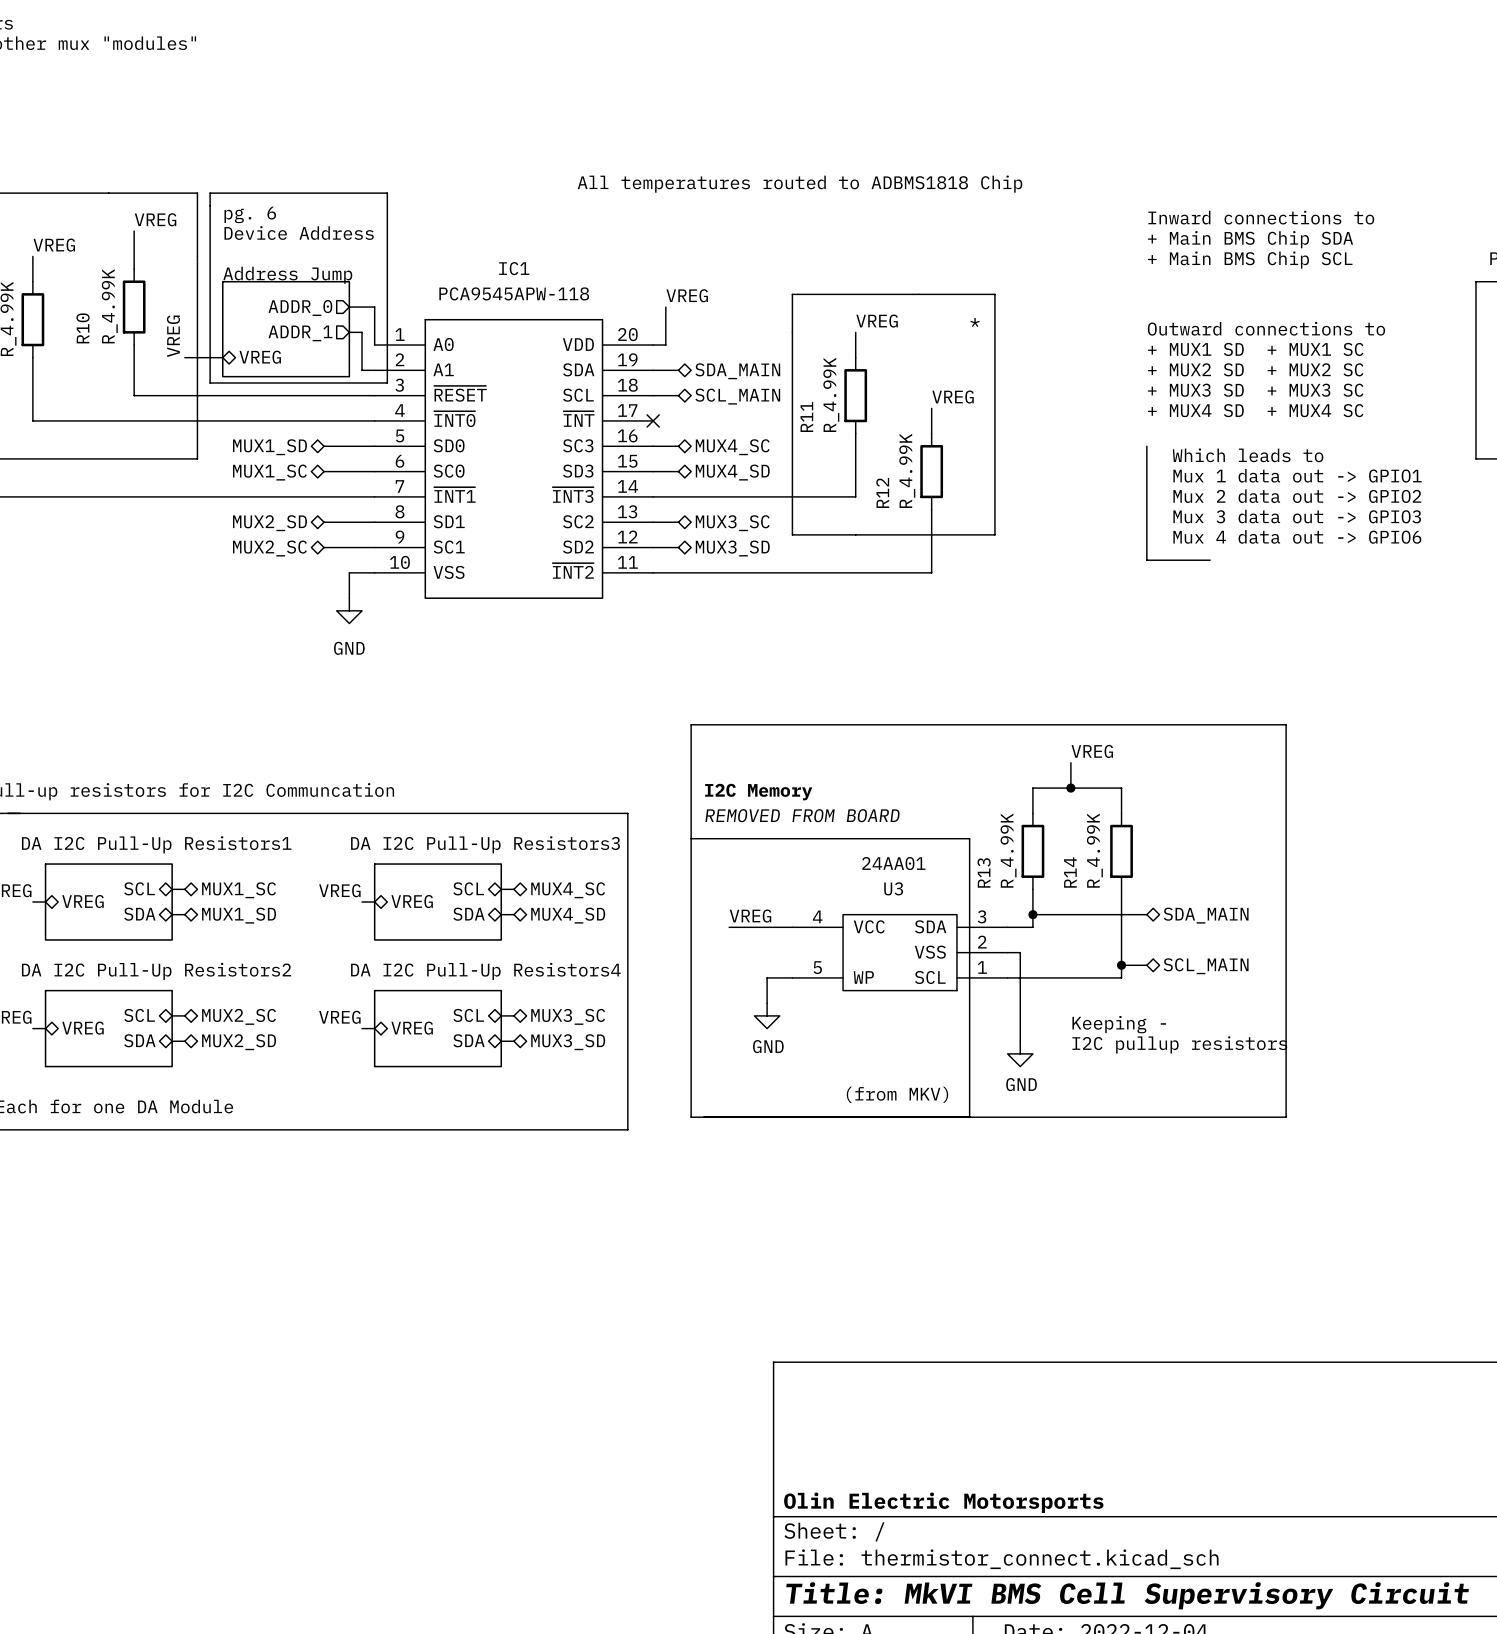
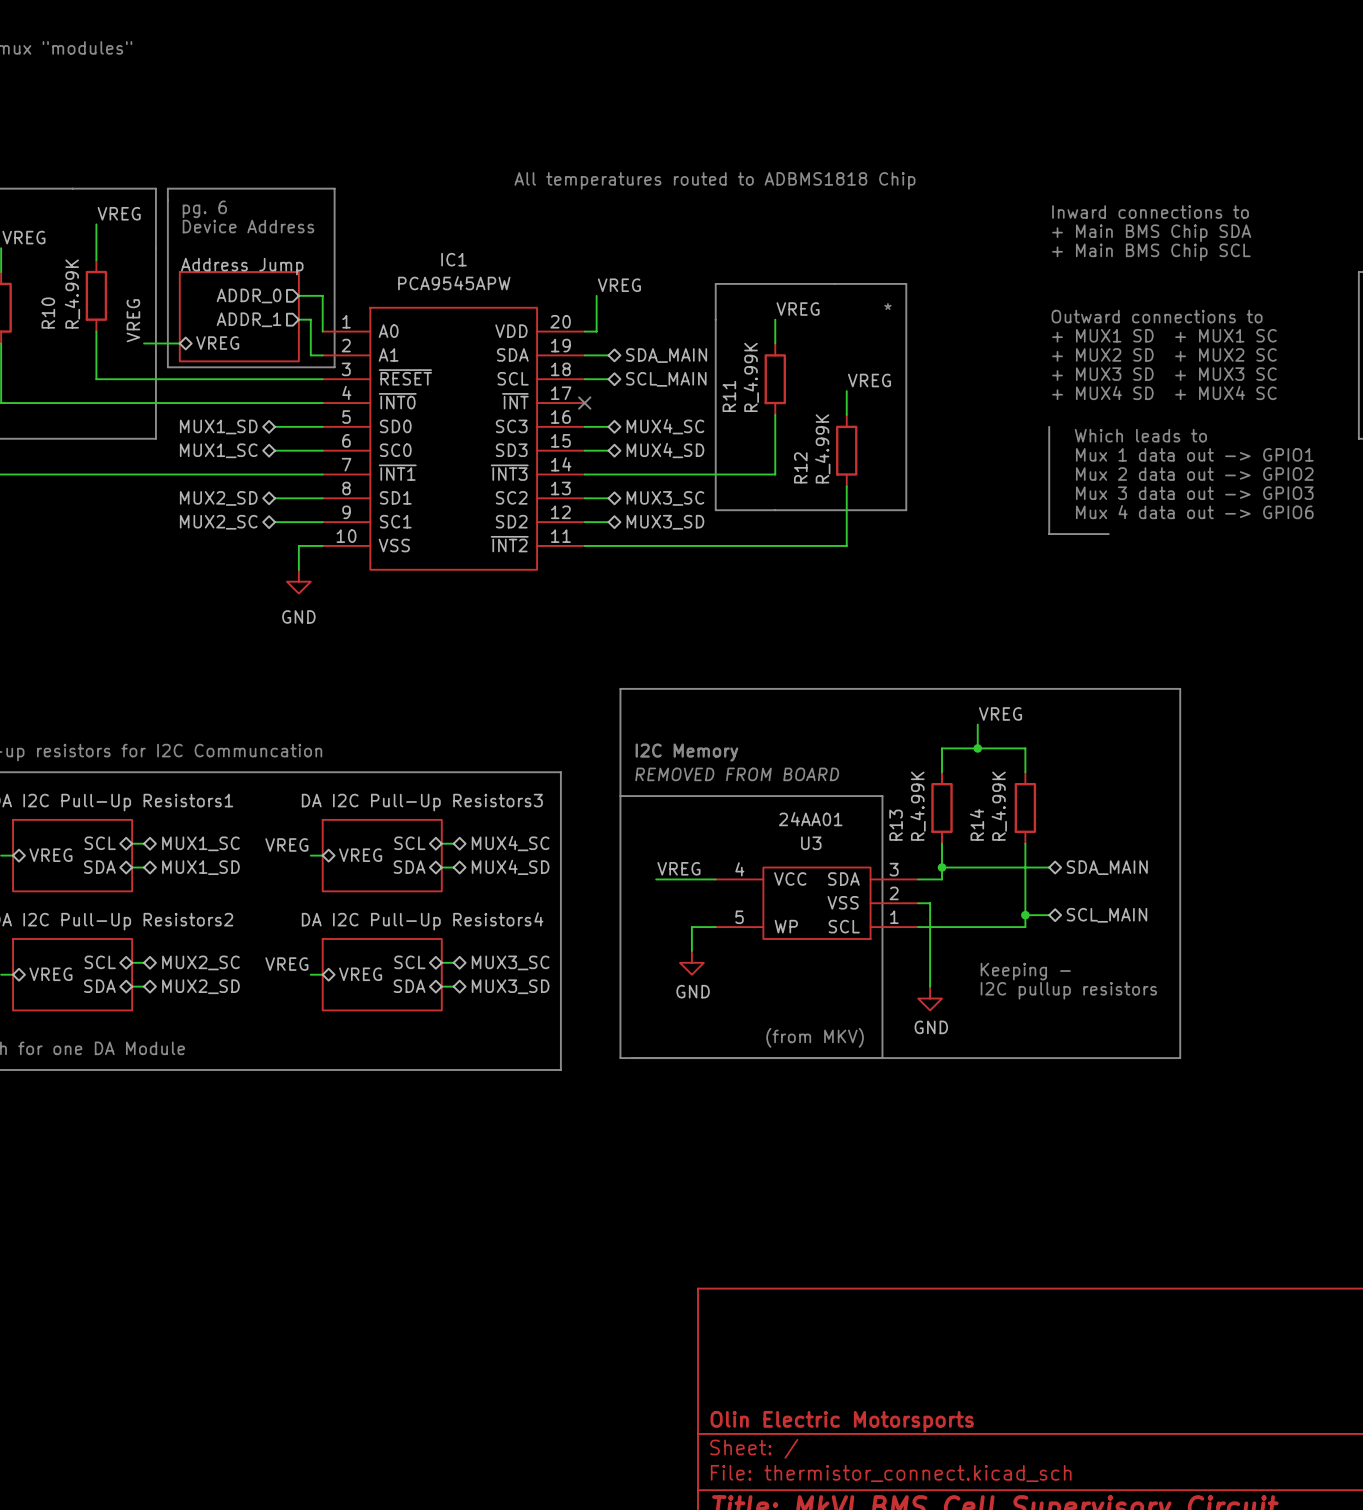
IC1 value: PCA9545APW-118 (514, 293) -> PCA9545APW (454, 283)

